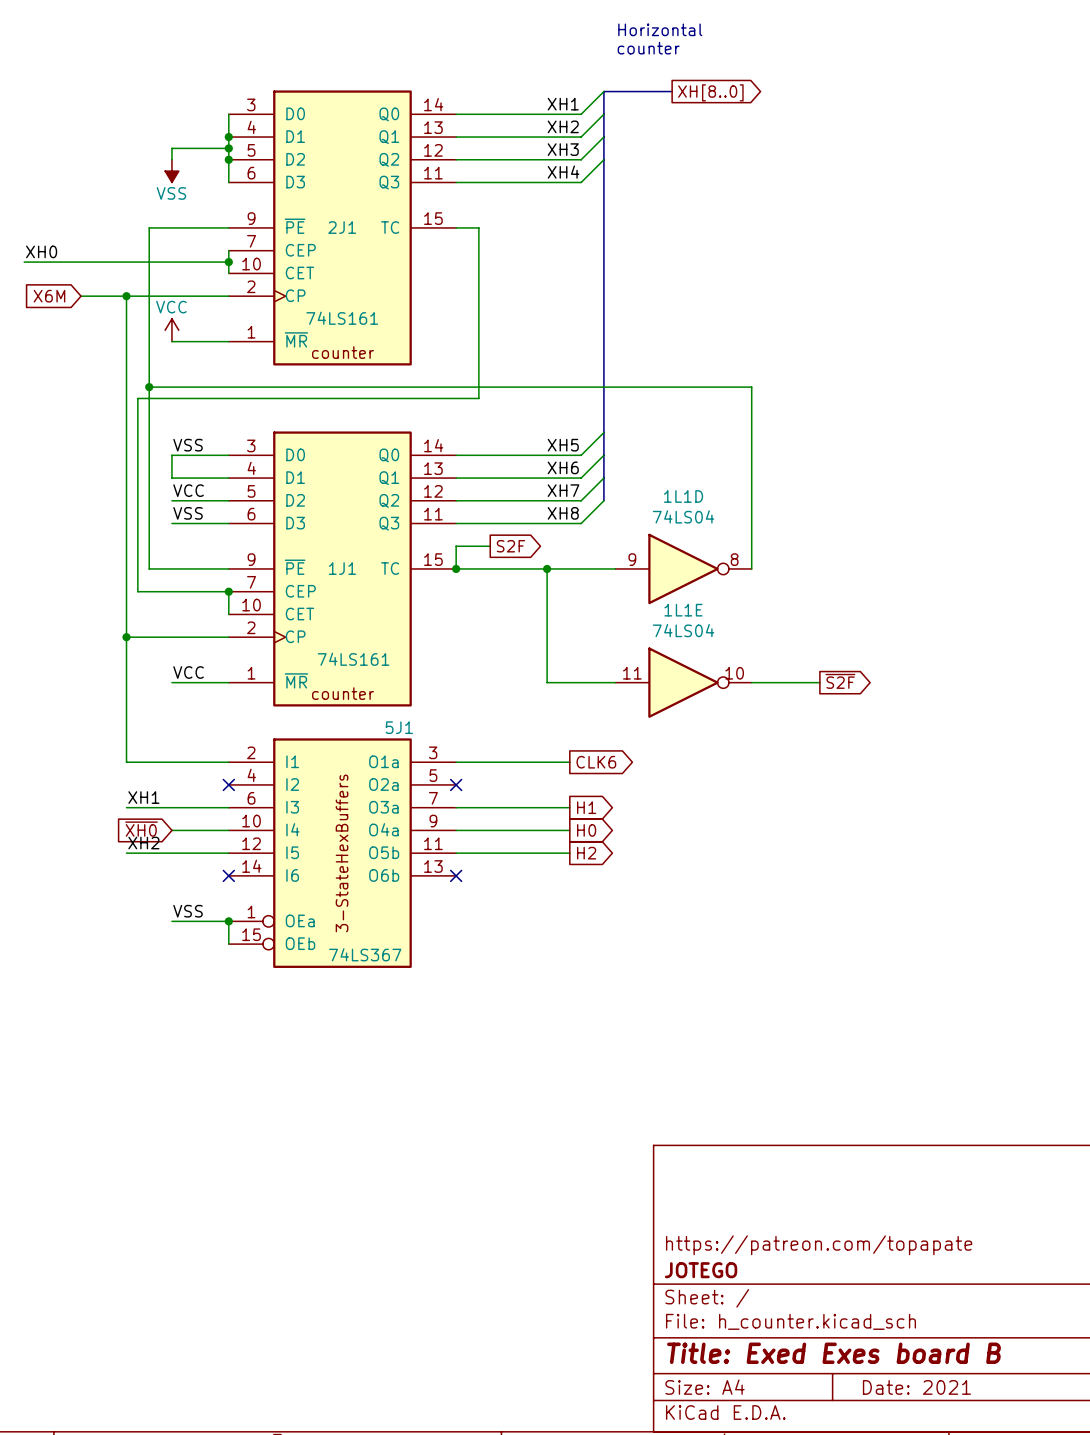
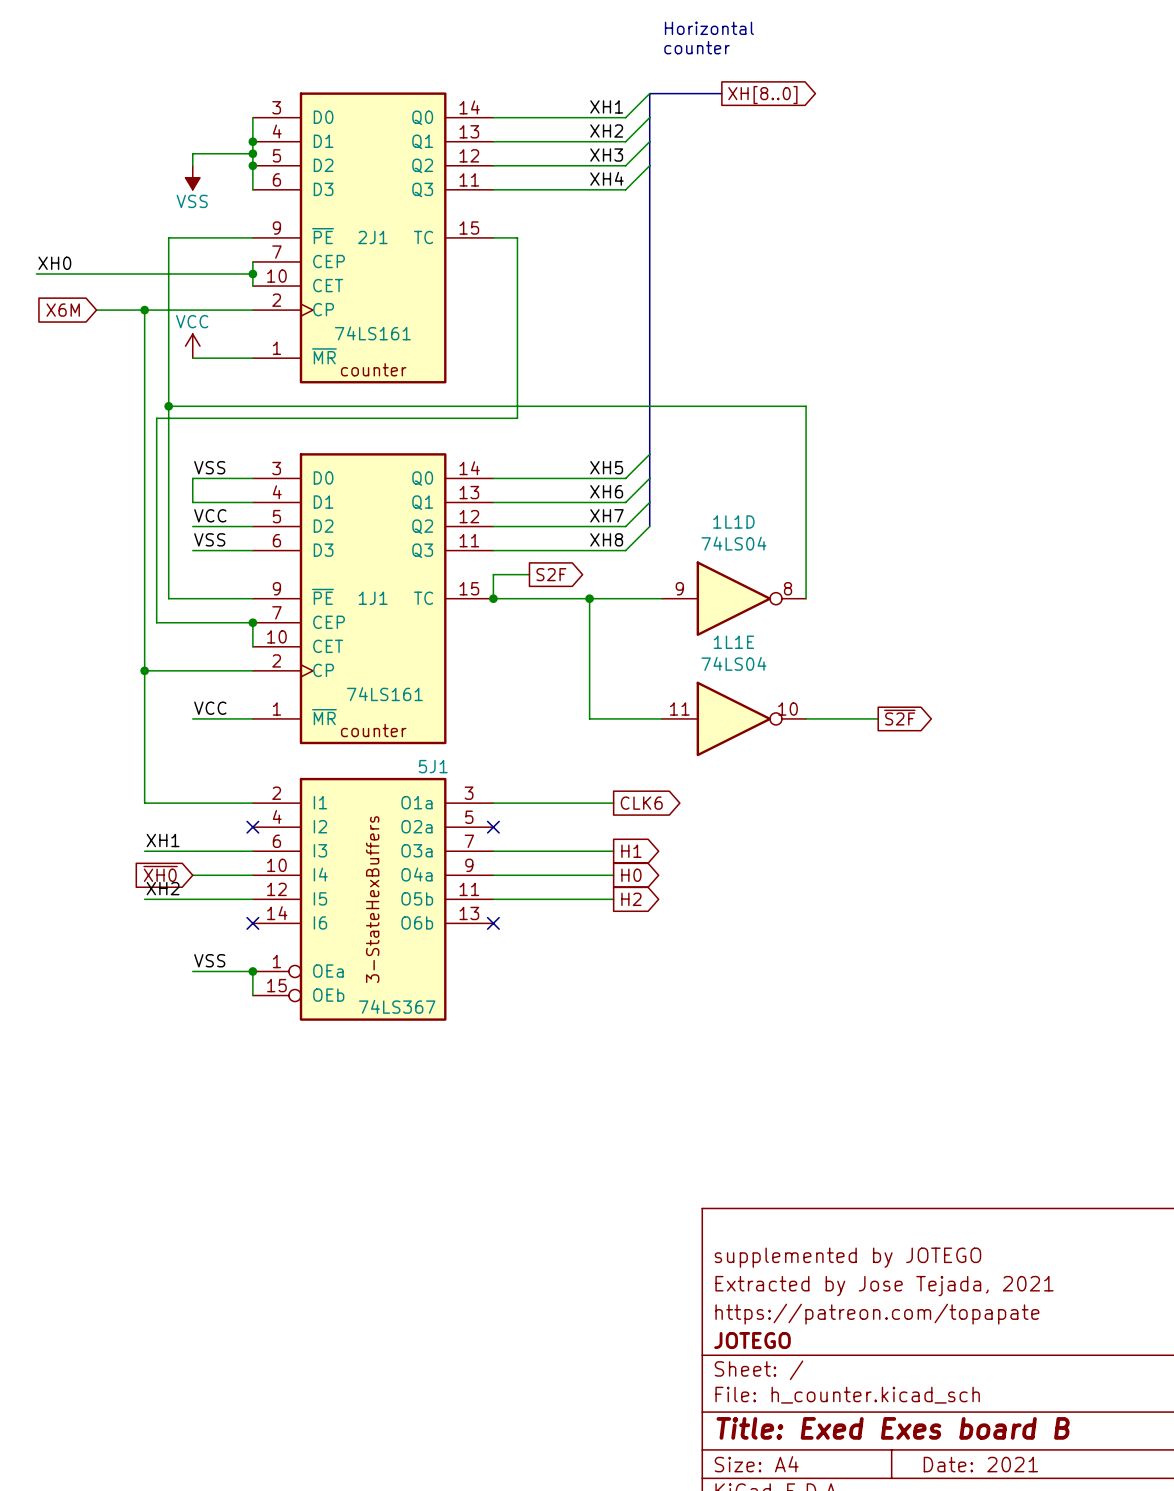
title block: none -> supplemented by JOTEGO (847, 1257)
title block: none -> Extracted by Jose Tejada, 2021 (884, 1286)

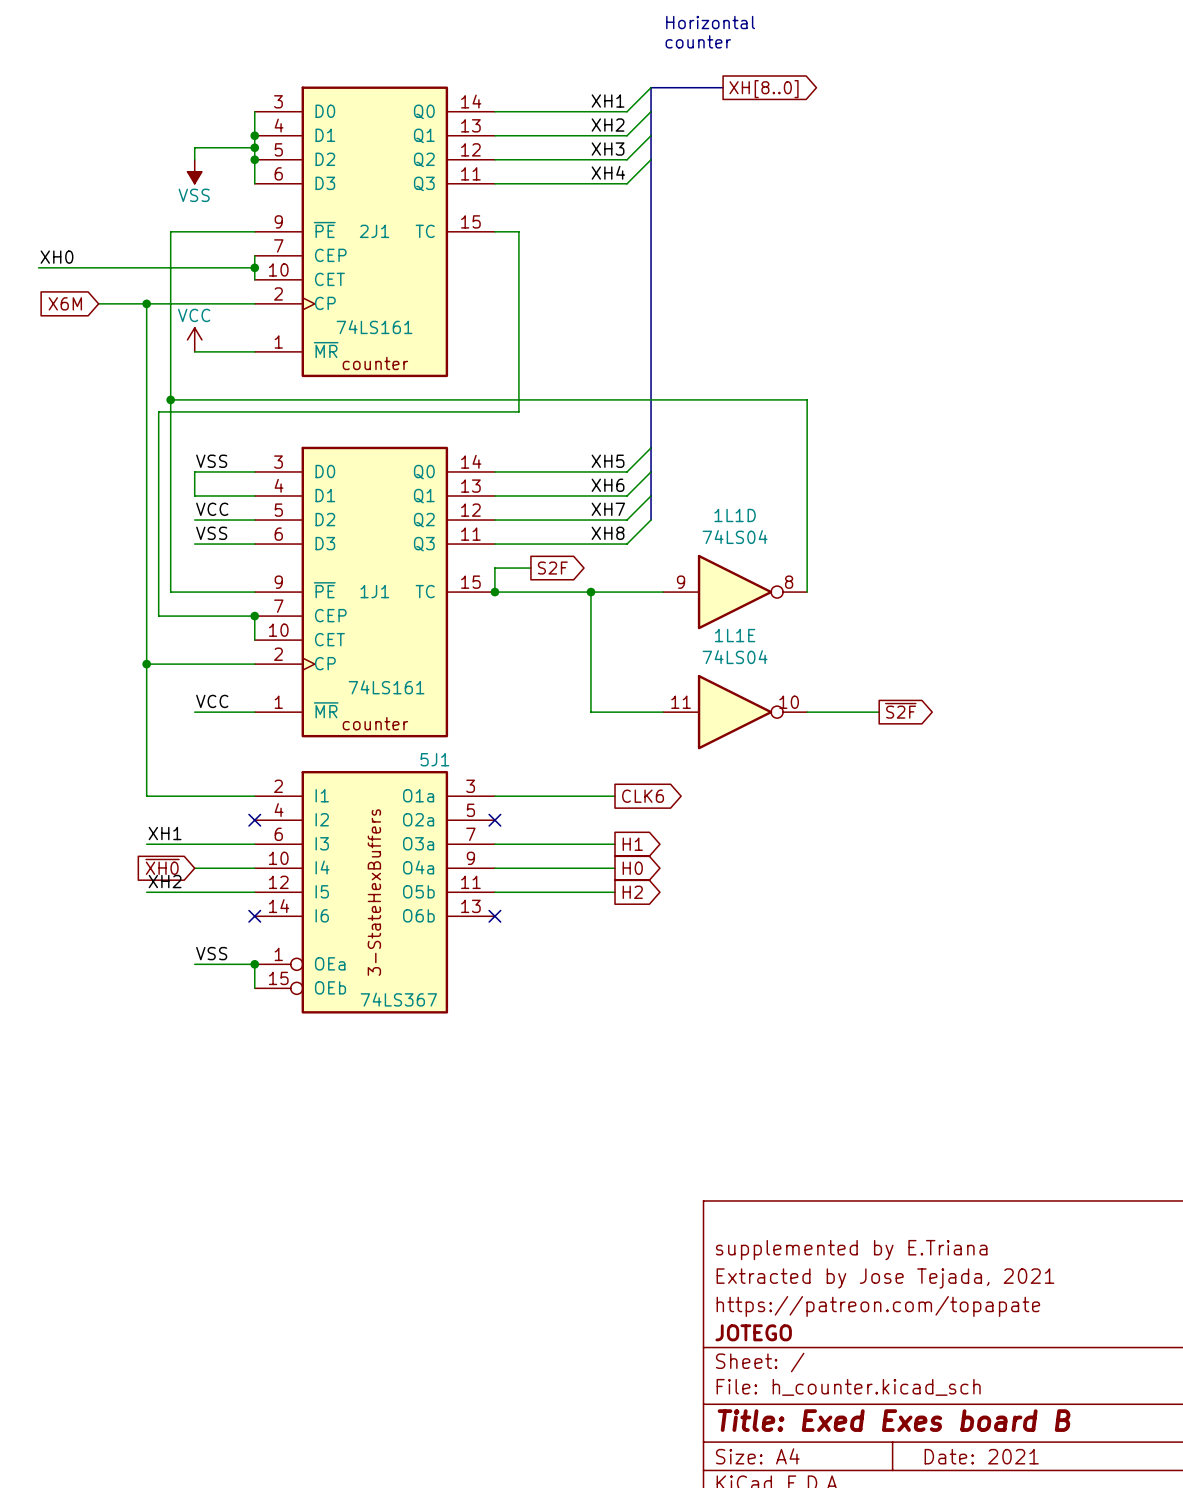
title block: supplemented by JOTEGO (847, 1257) -> supplemented by E.Triana (851, 1250)

